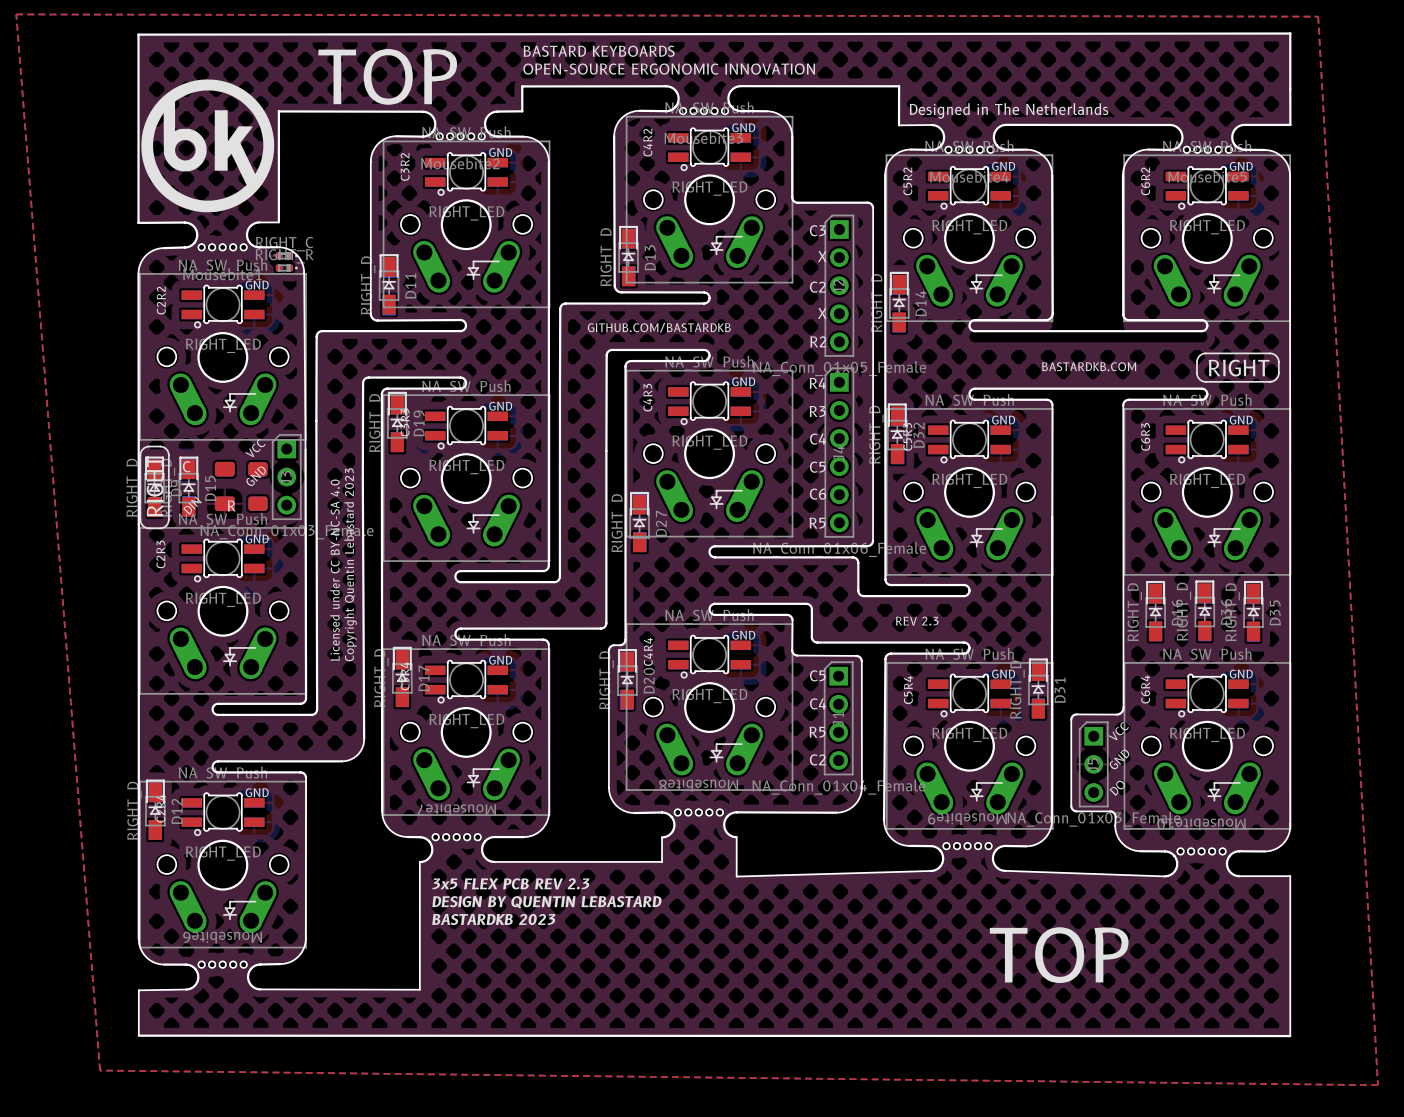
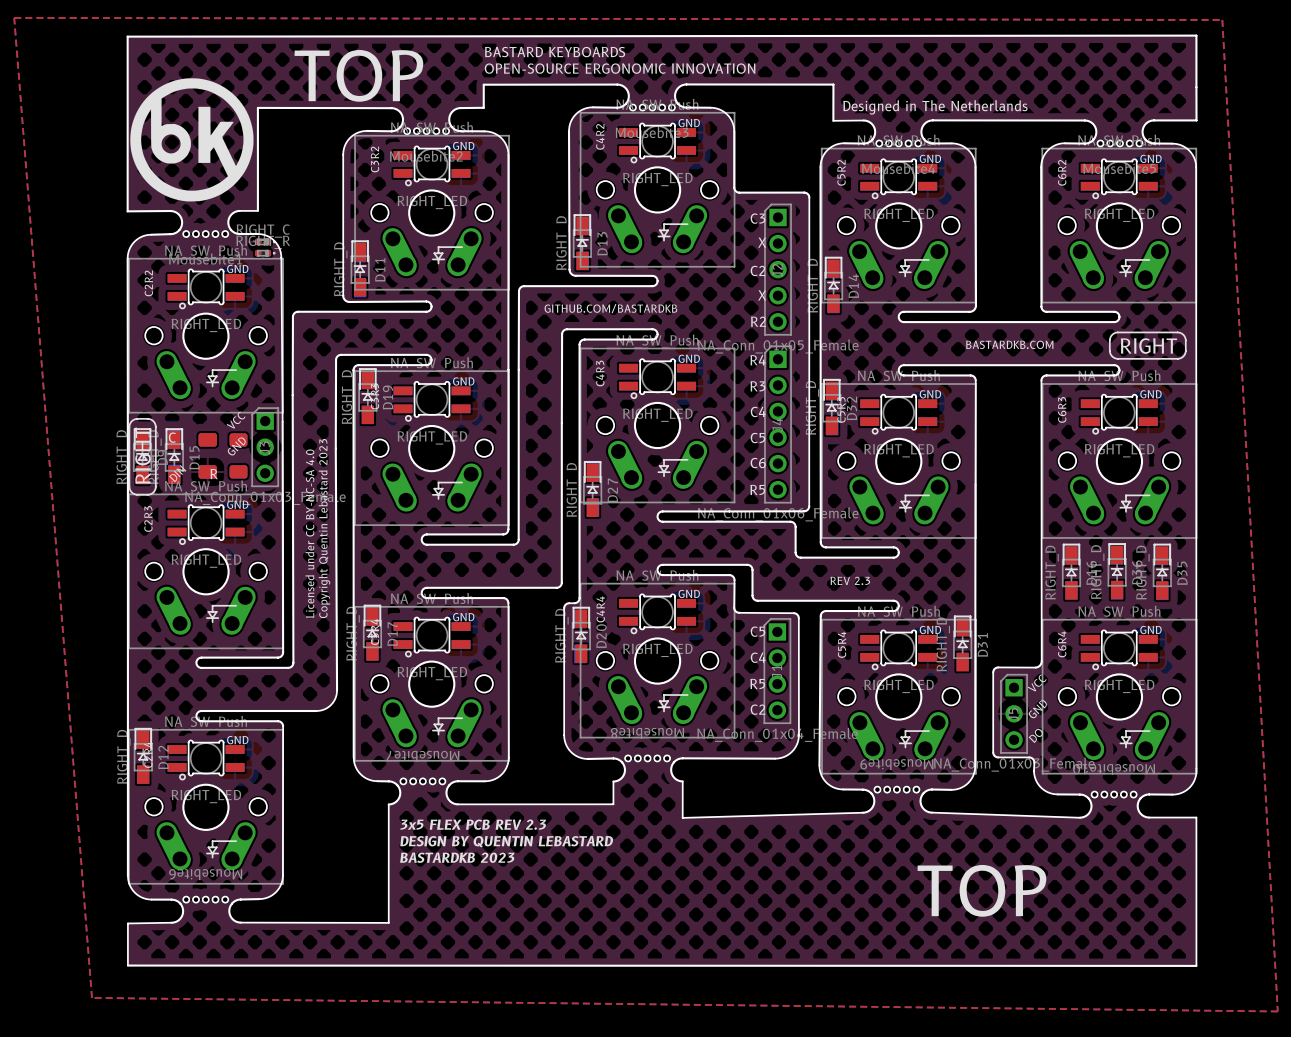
board edge: (1122, 174) (1124, 317) (1128, 320) (1203, 320) (1207, 326) (1201, 331) -> (975, 166) (975, 308) (970, 311) (903, 311) (898, 315) (900, 320) (1114, 322) (1117, 320) (1119, 316) (1117, 313) (1114, 311)
board edge: (1052, 175) (1051, 316) (1046, 320) (974, 320) (970, 322) (969, 327) (975, 331) (1128, 331) -> (1041, 166) (1041, 306) (1042, 310) (1046, 311)

